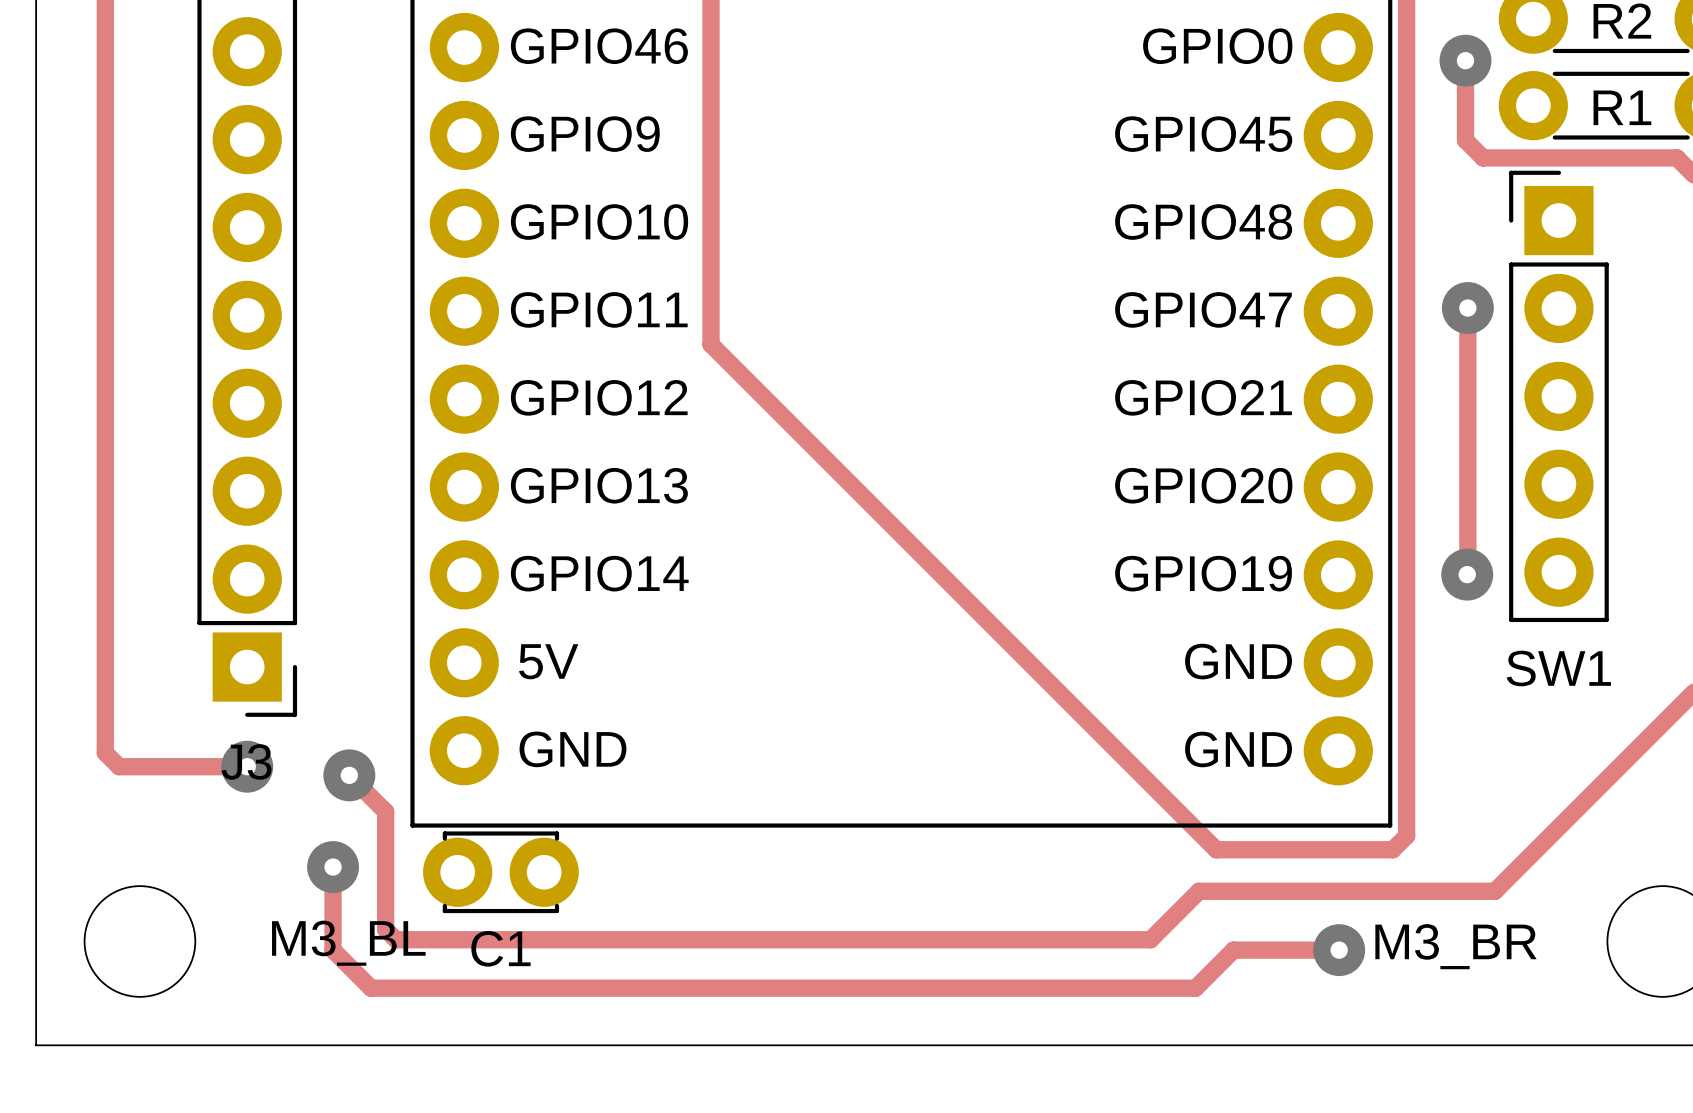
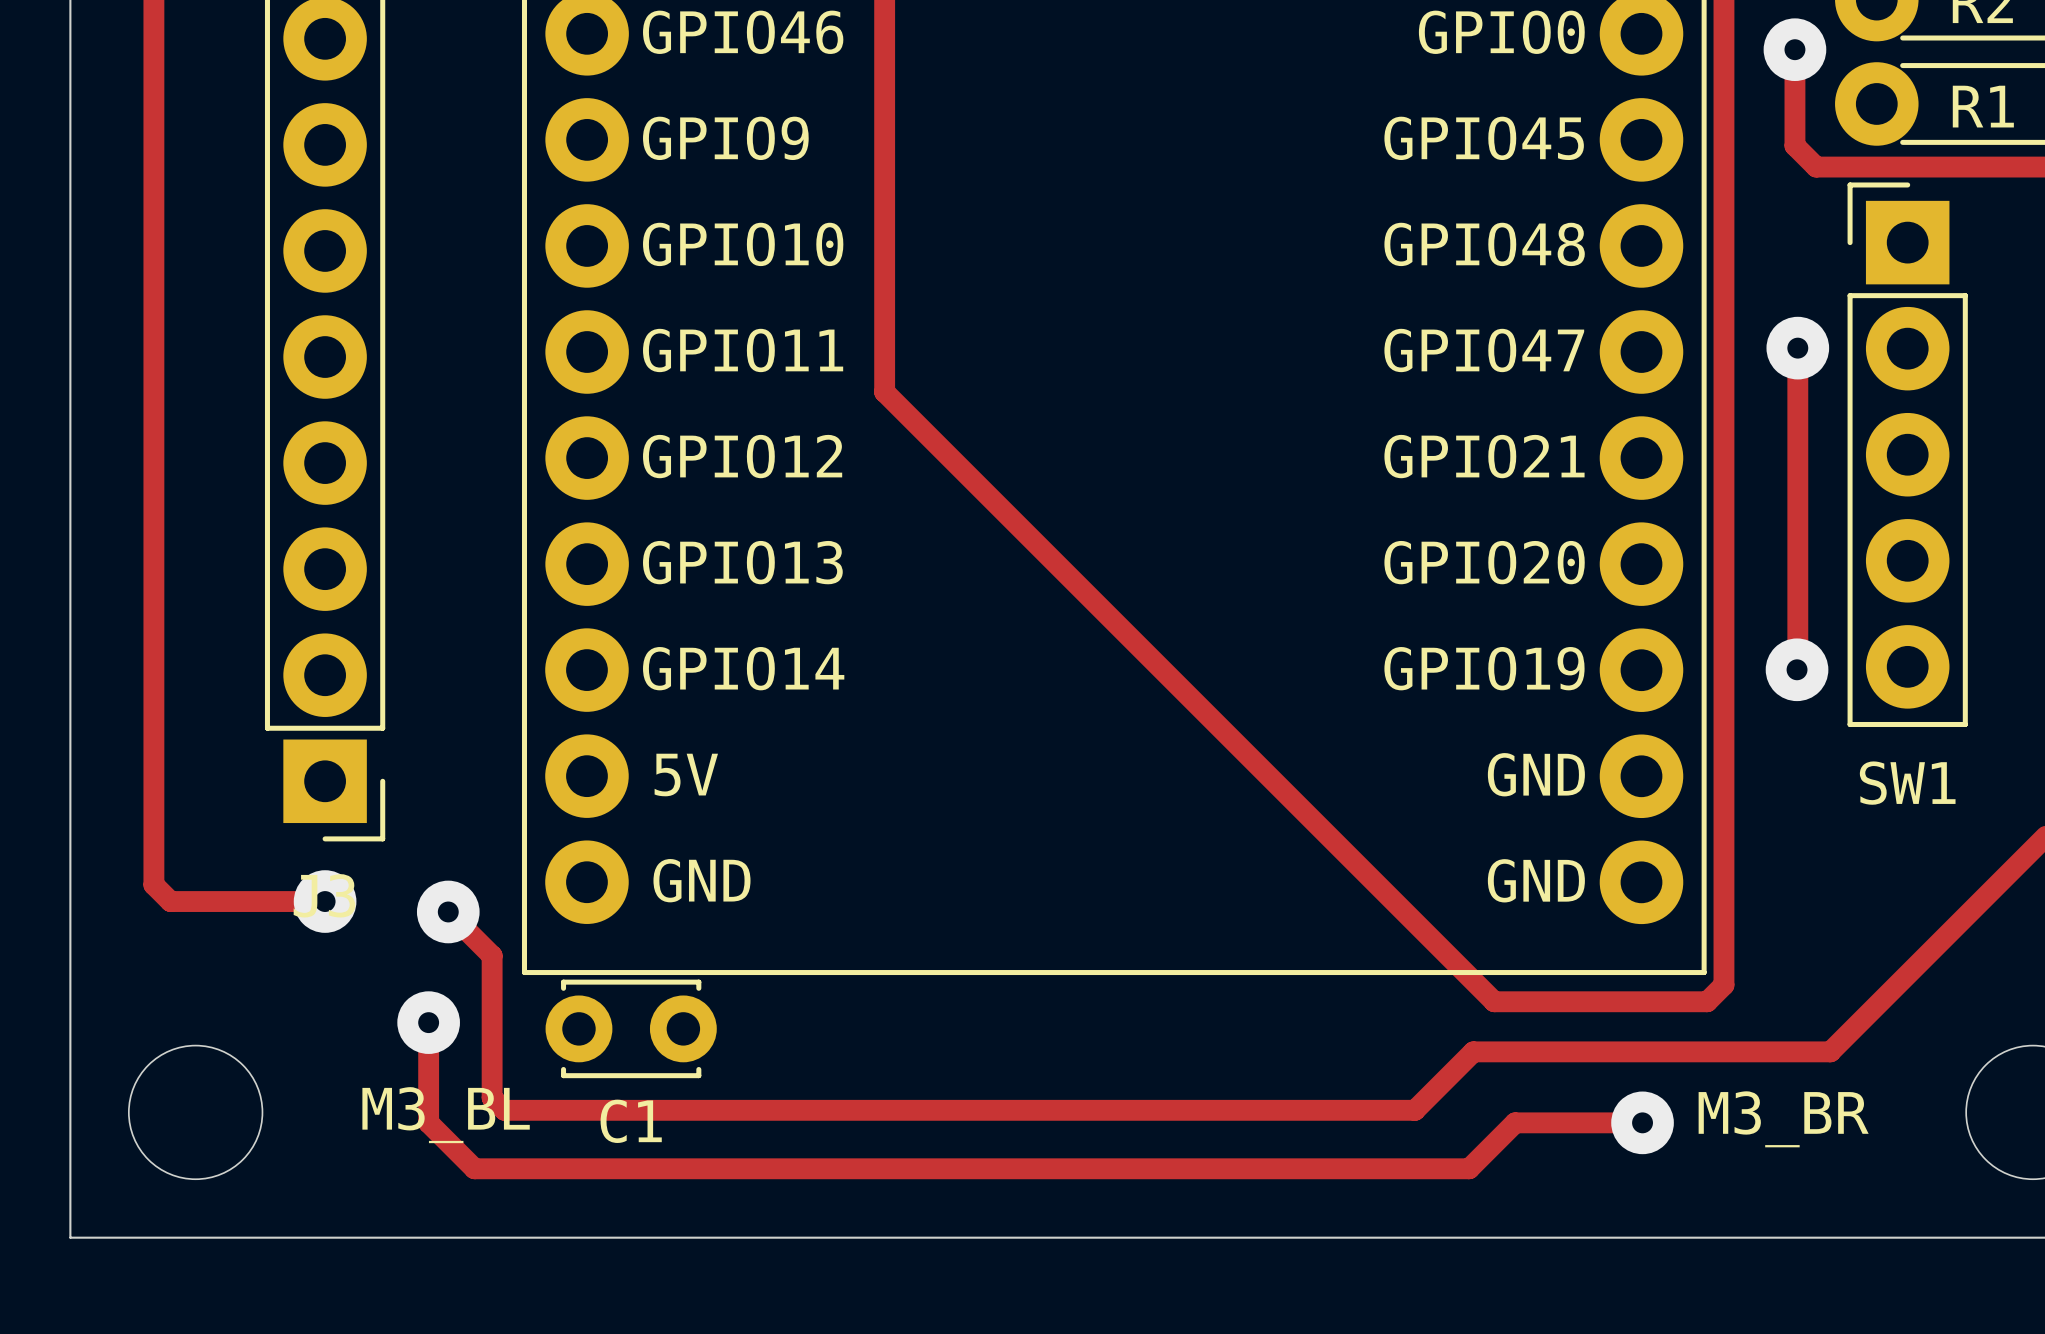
C1 footprint: [423, 831, 579, 914] -> [545, 979, 717, 1079]

